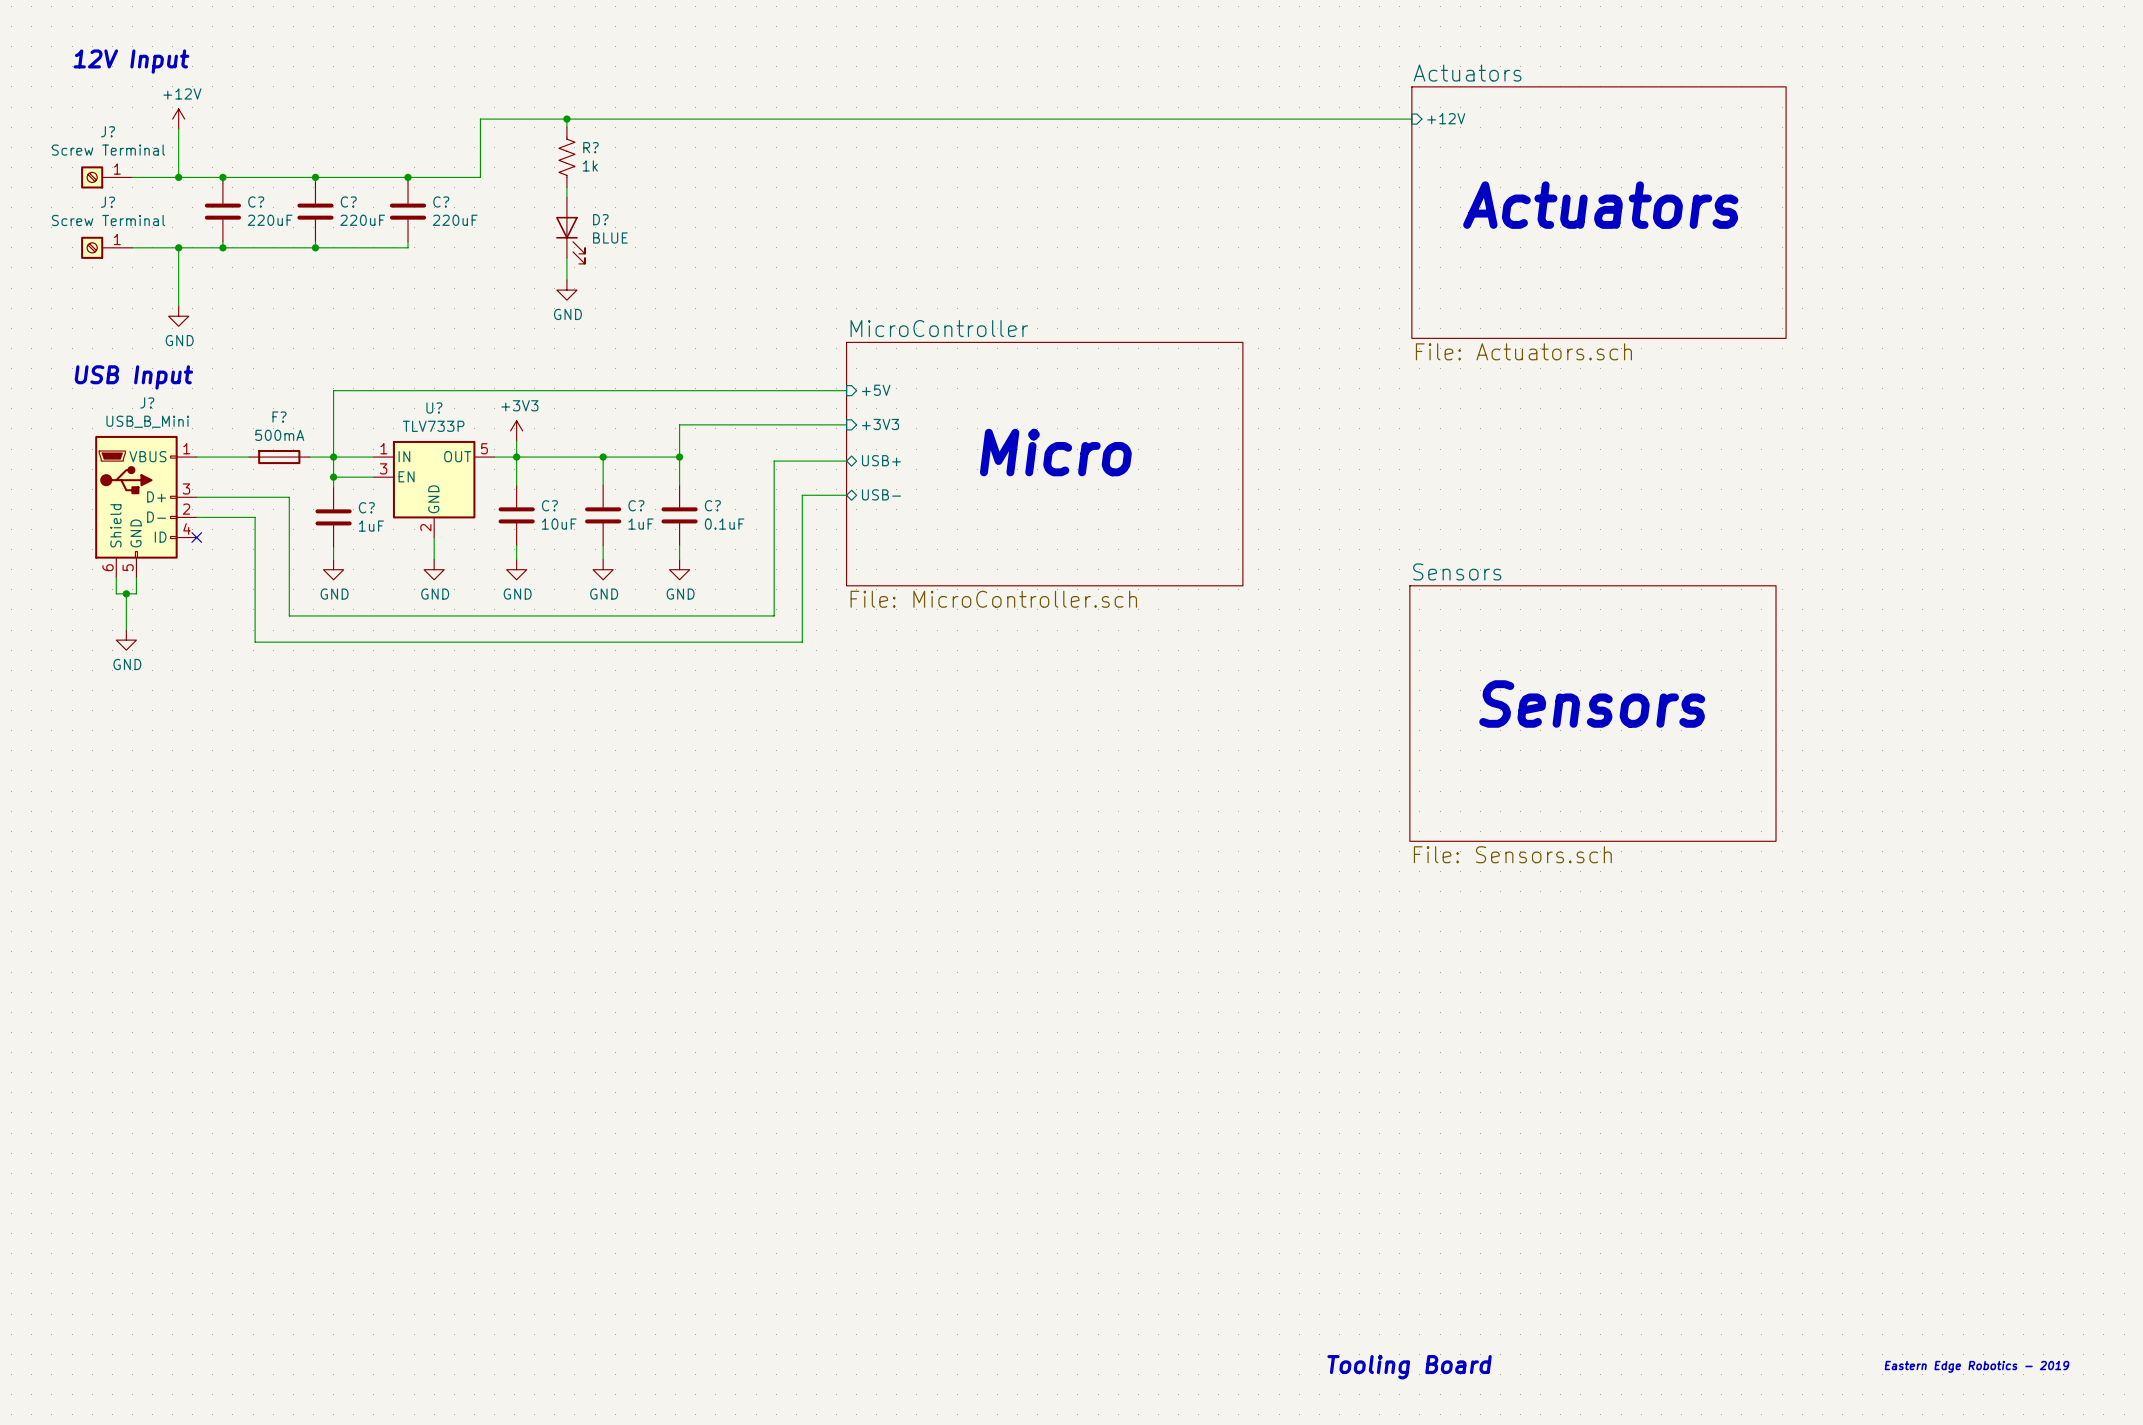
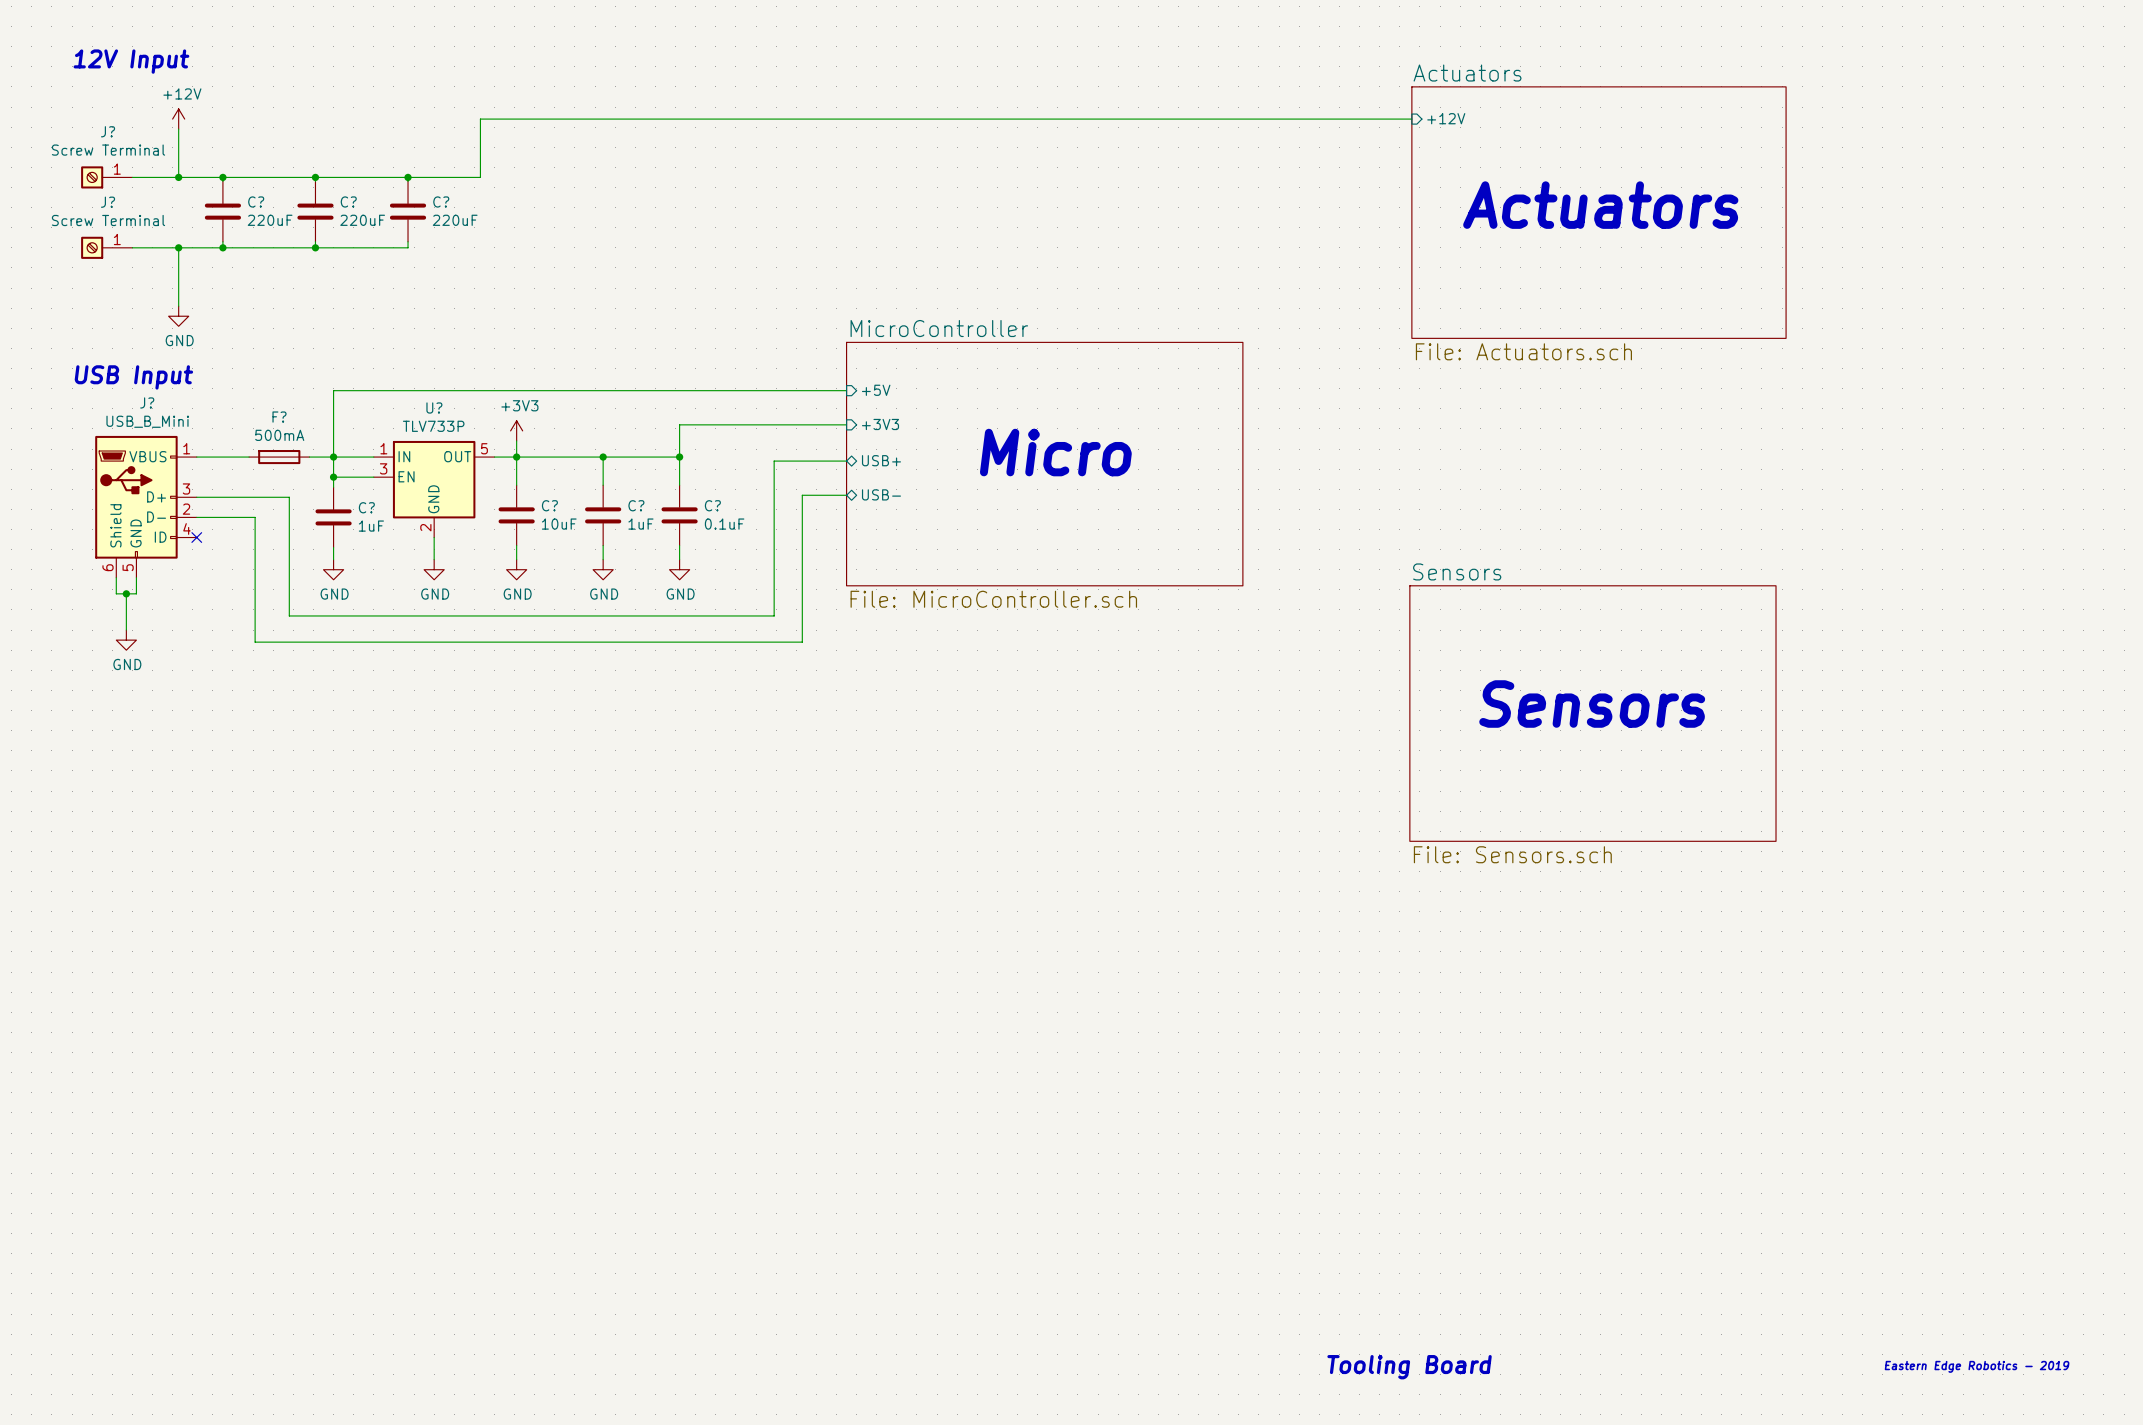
wire: (566, 119) (566, 127) -> none
junction: (566, 119) -> none
R?: 1k (566, 157) -> none
wire: (566, 187) (566, 197) -> none
D?: BLUE (570, 230) -> none
wire: (566, 257) (566, 280) -> none
power symbol: GND (566, 290) -> none

